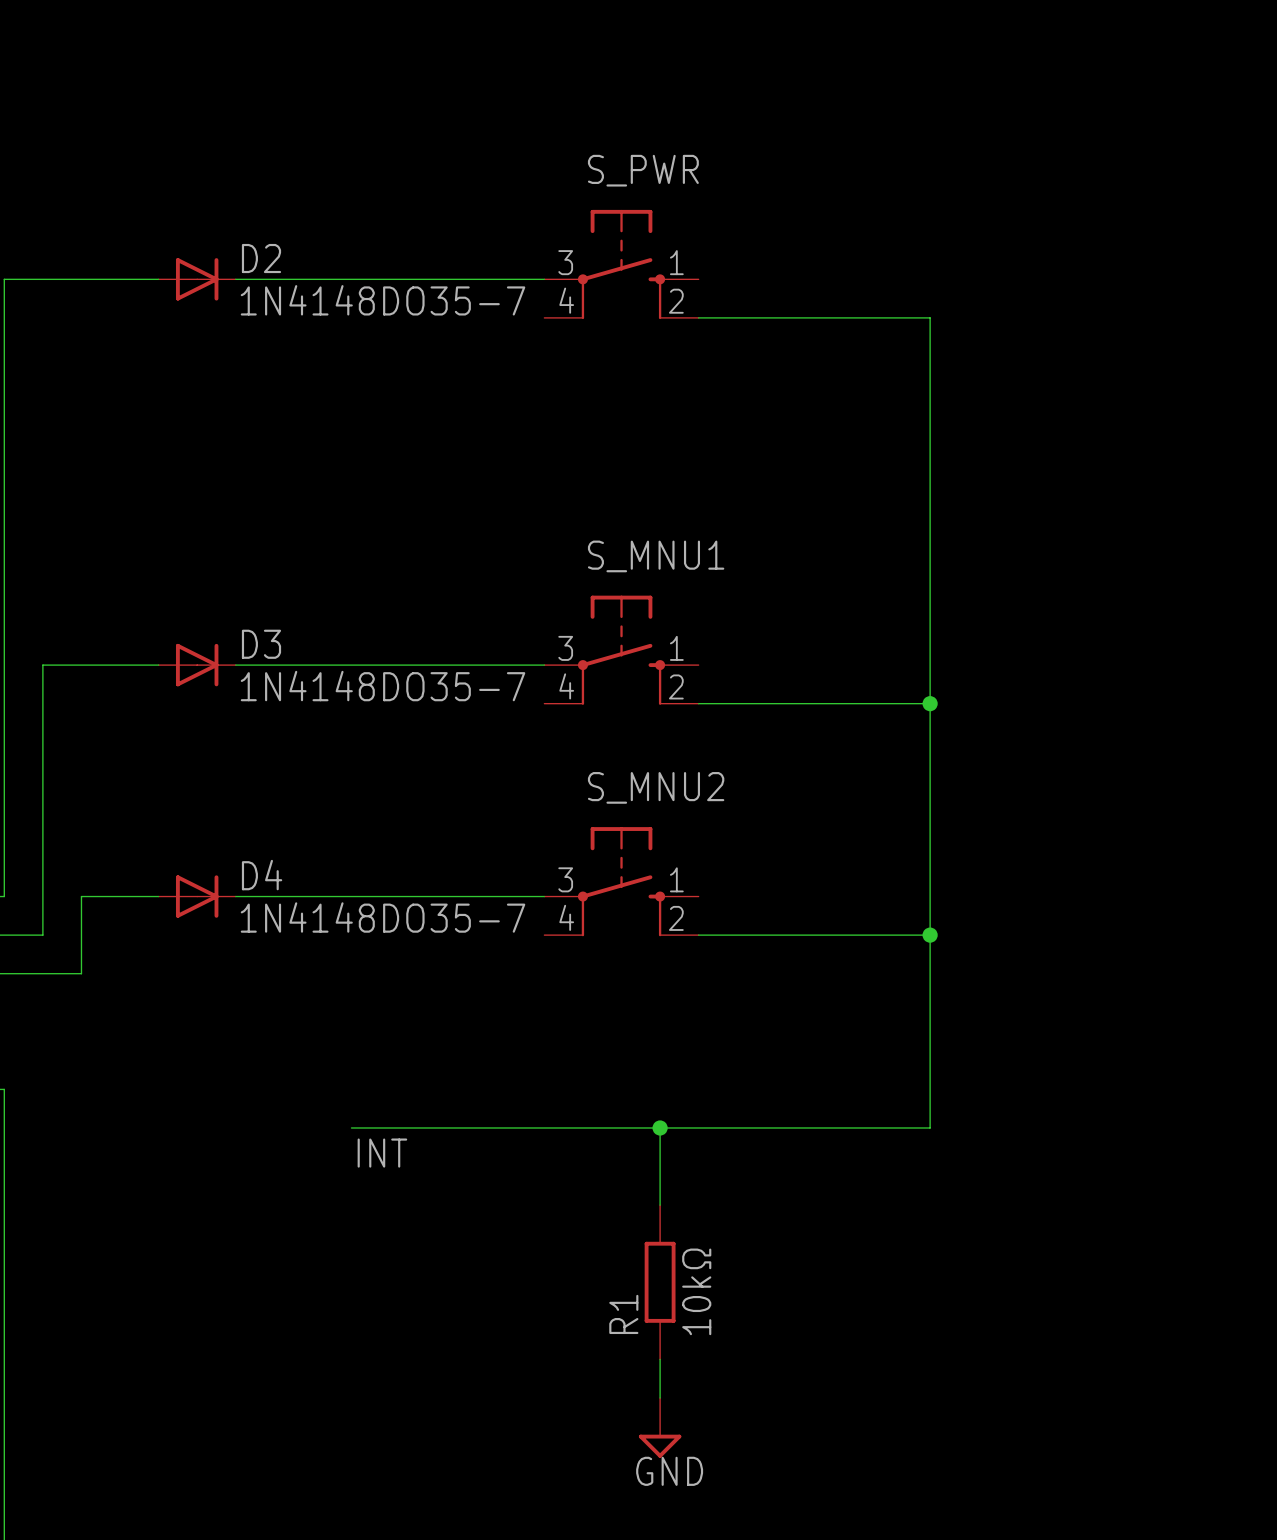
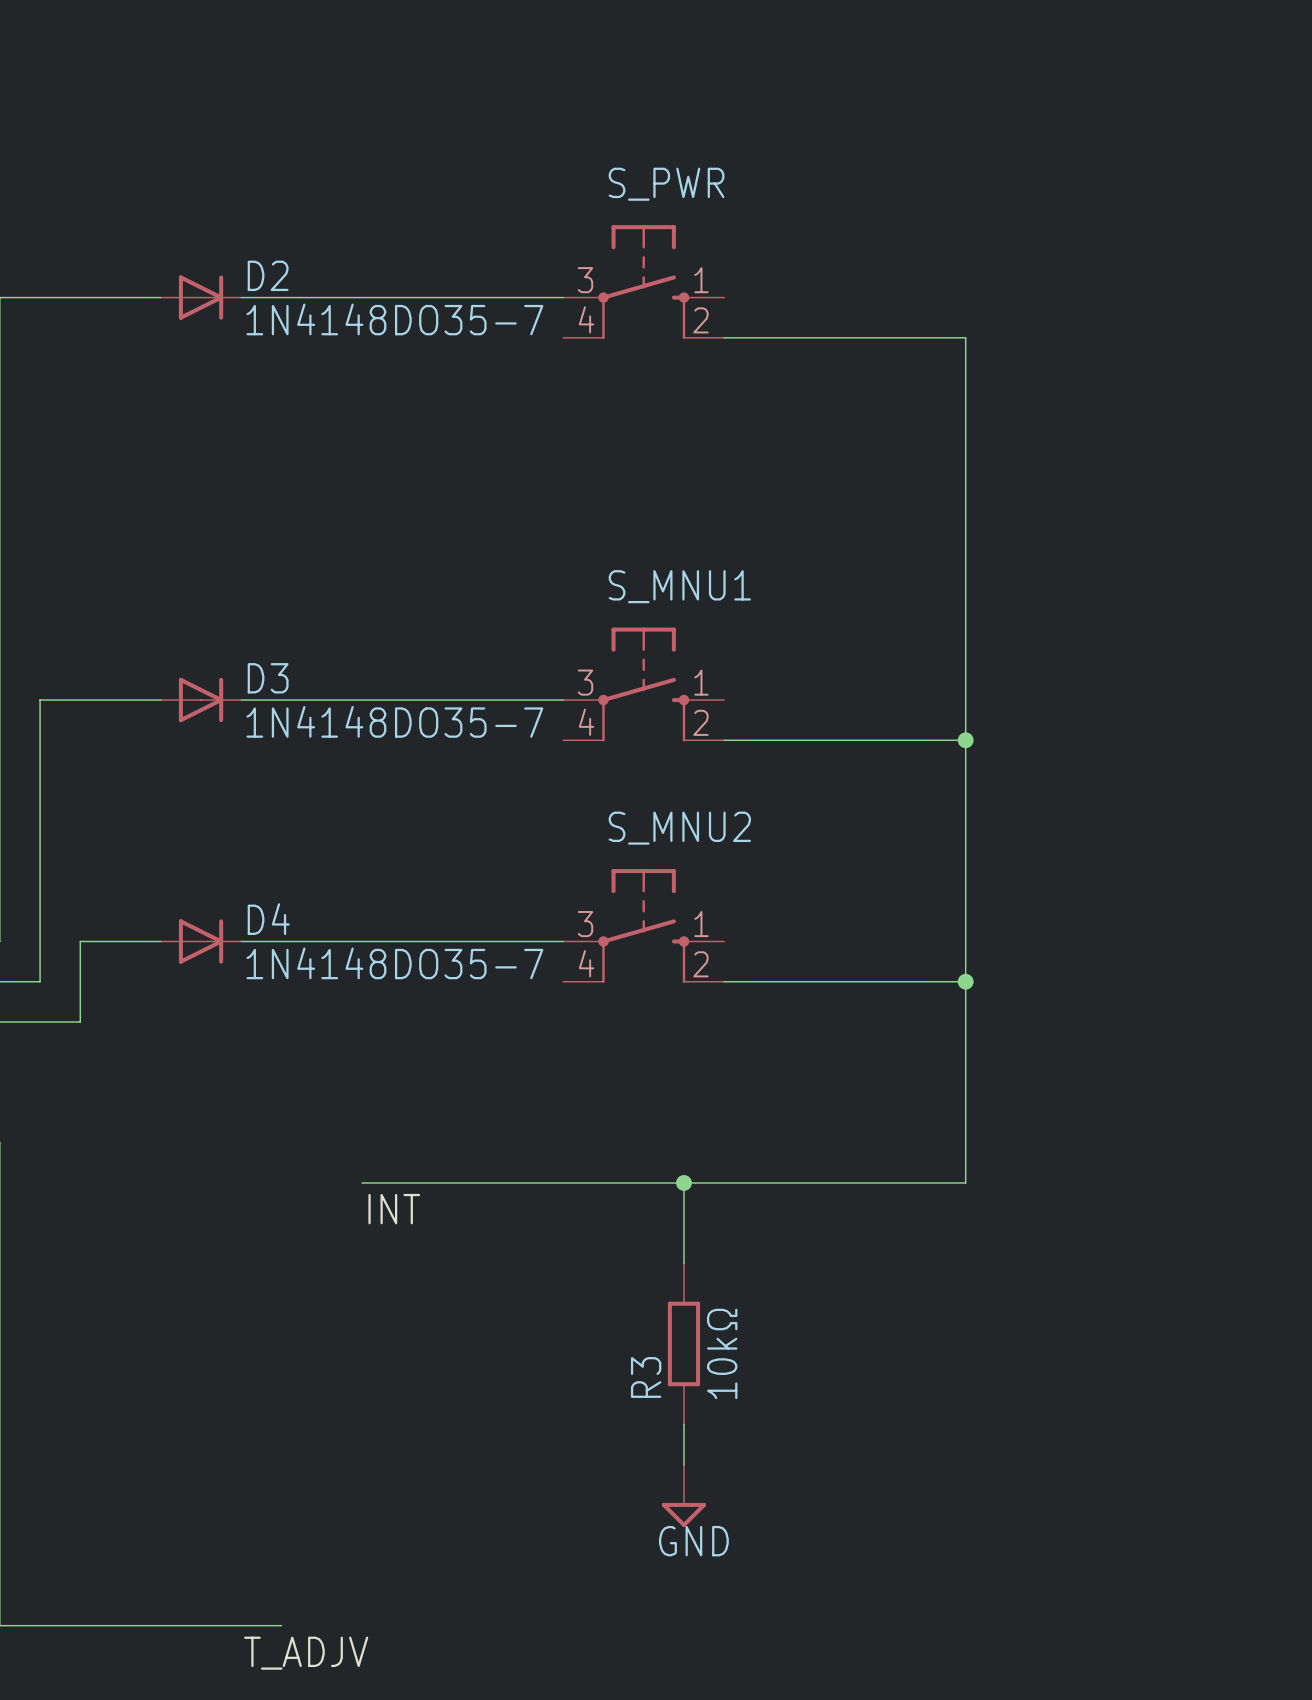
R1 name: R1 (623, 1314) -> R3 (646, 1377)

